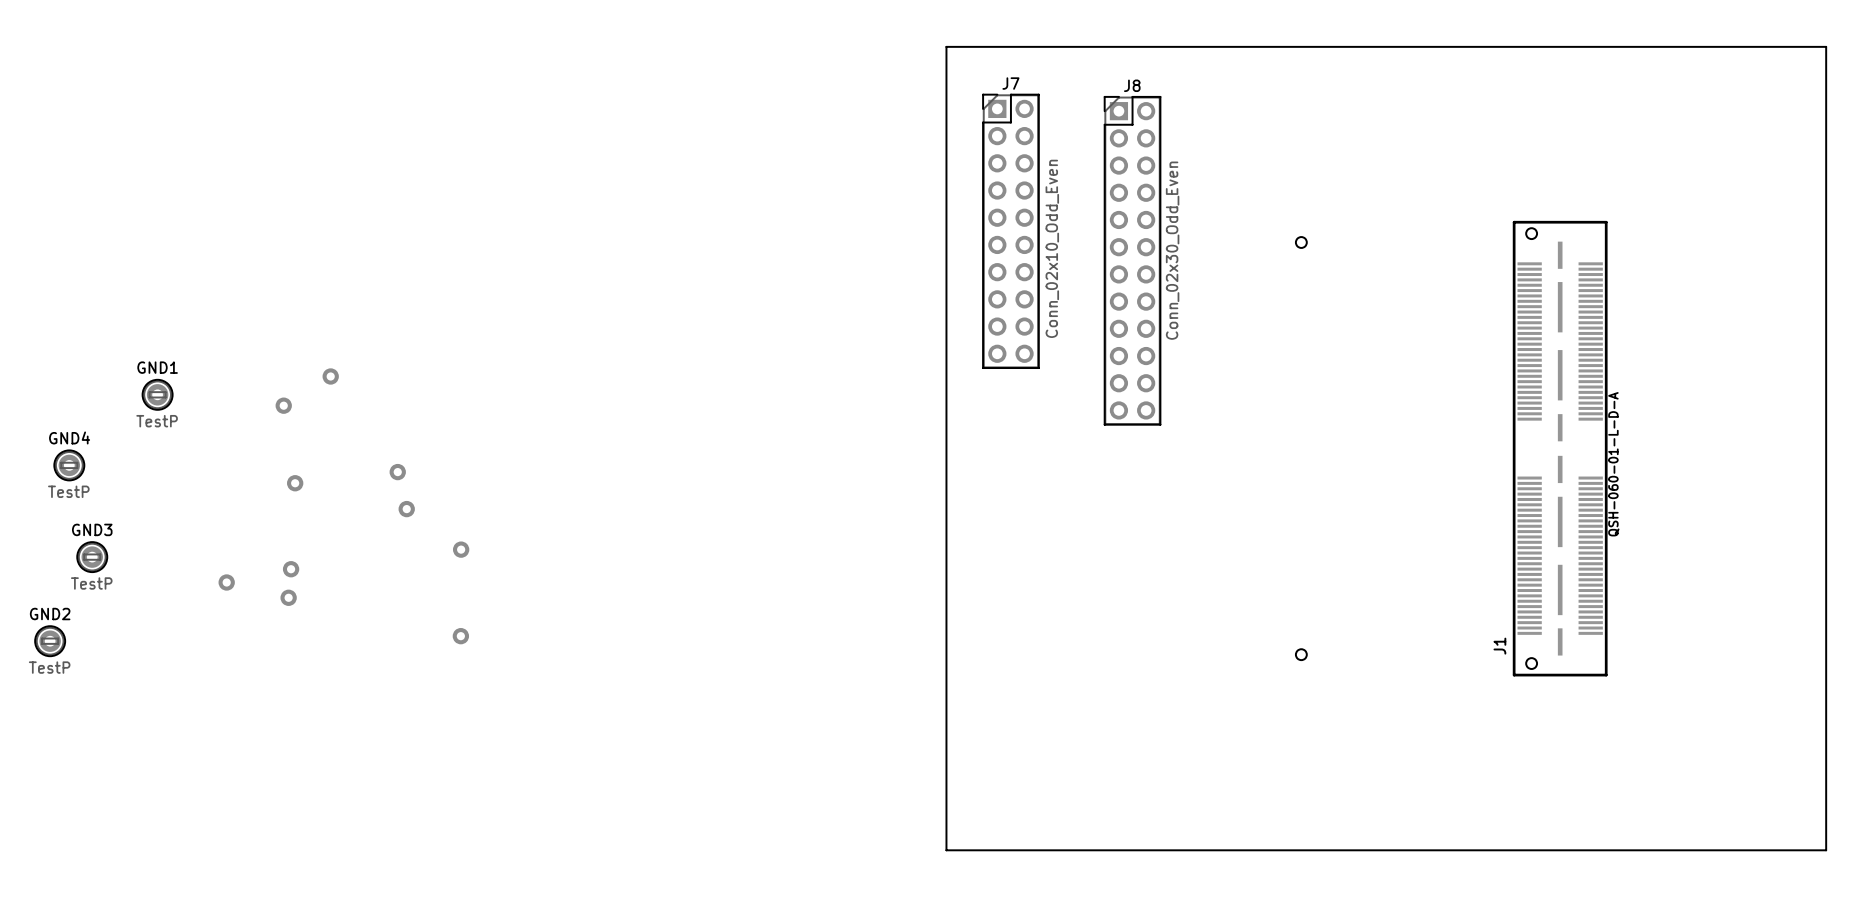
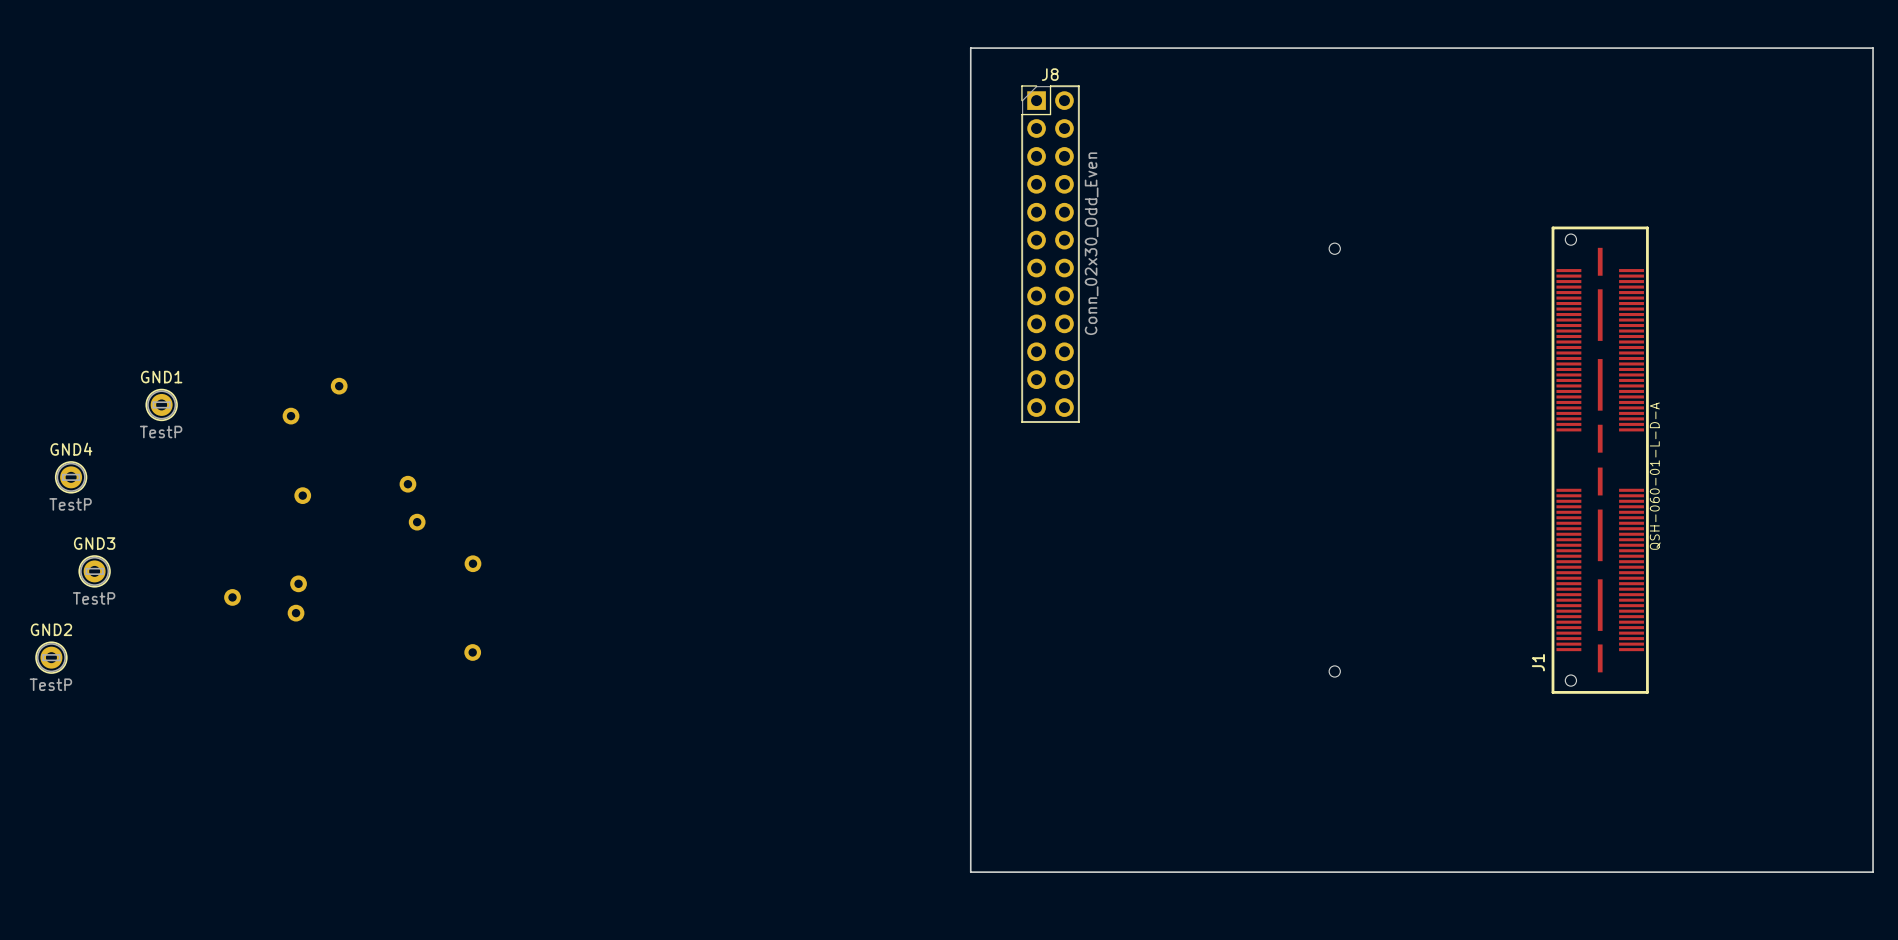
J7: Conn_02x10_Odd_Even (1010, 231) -> none
J8 position: (1132, 260) -> (1050, 254)

